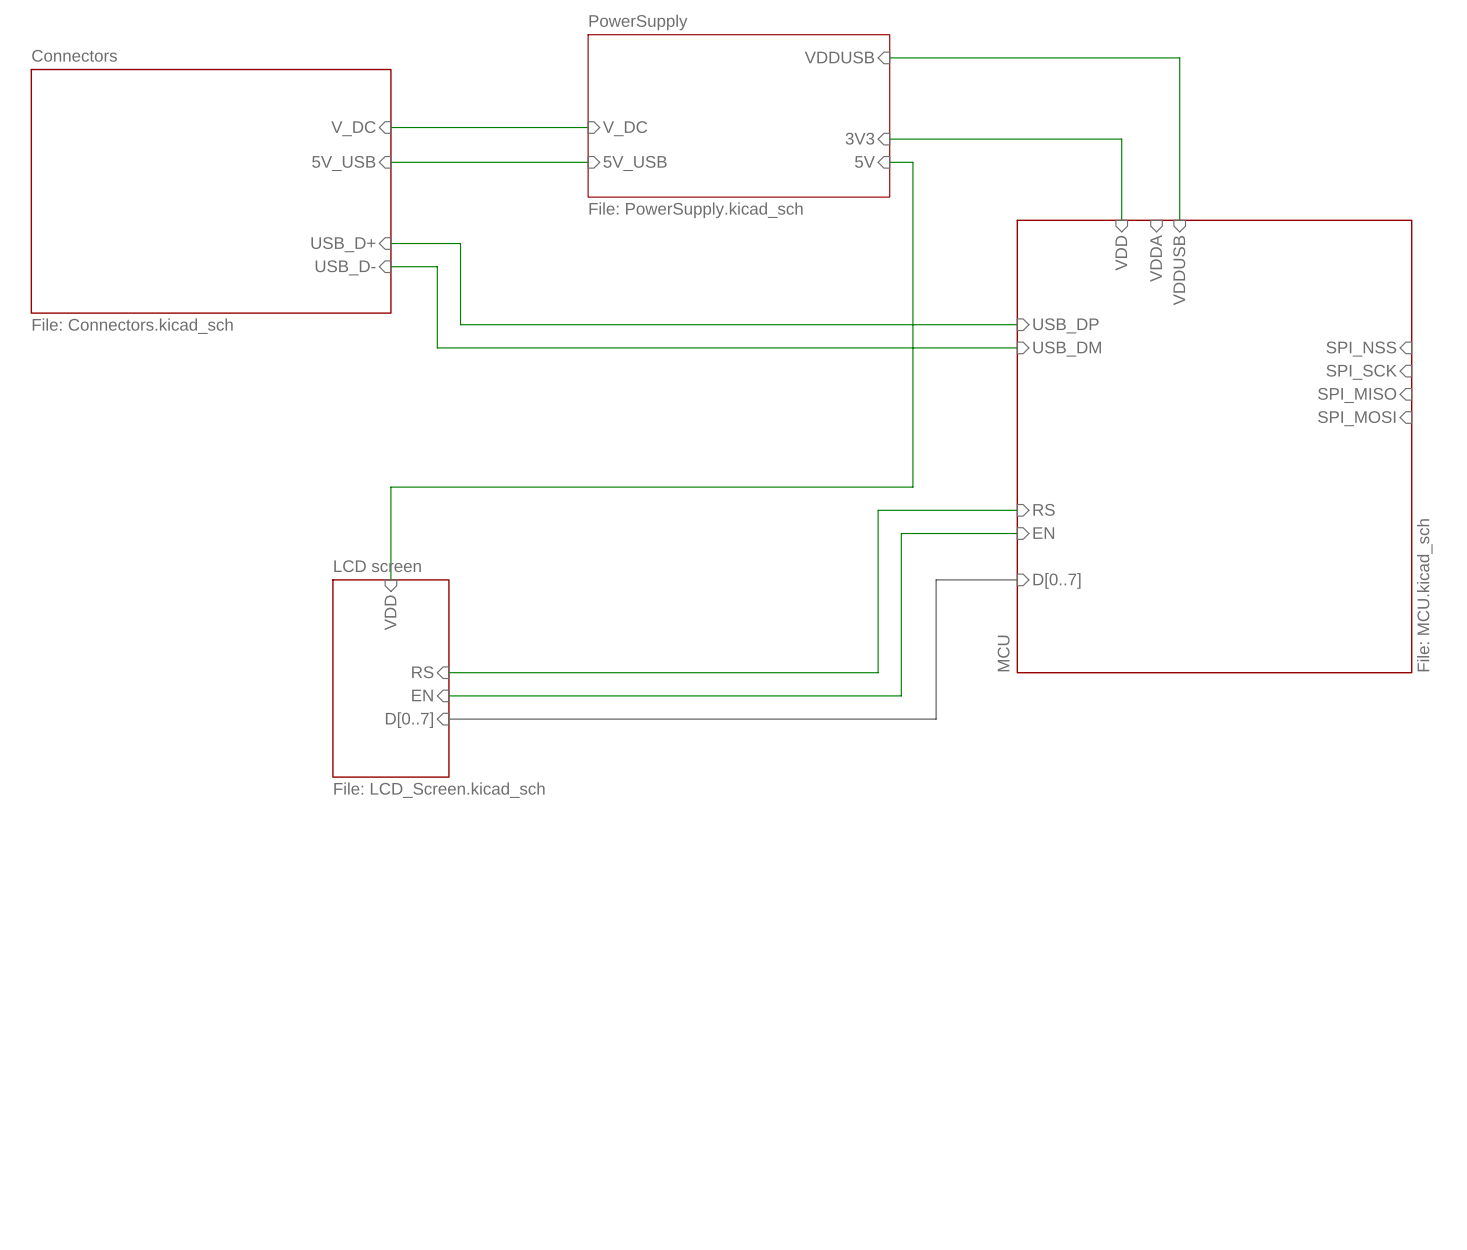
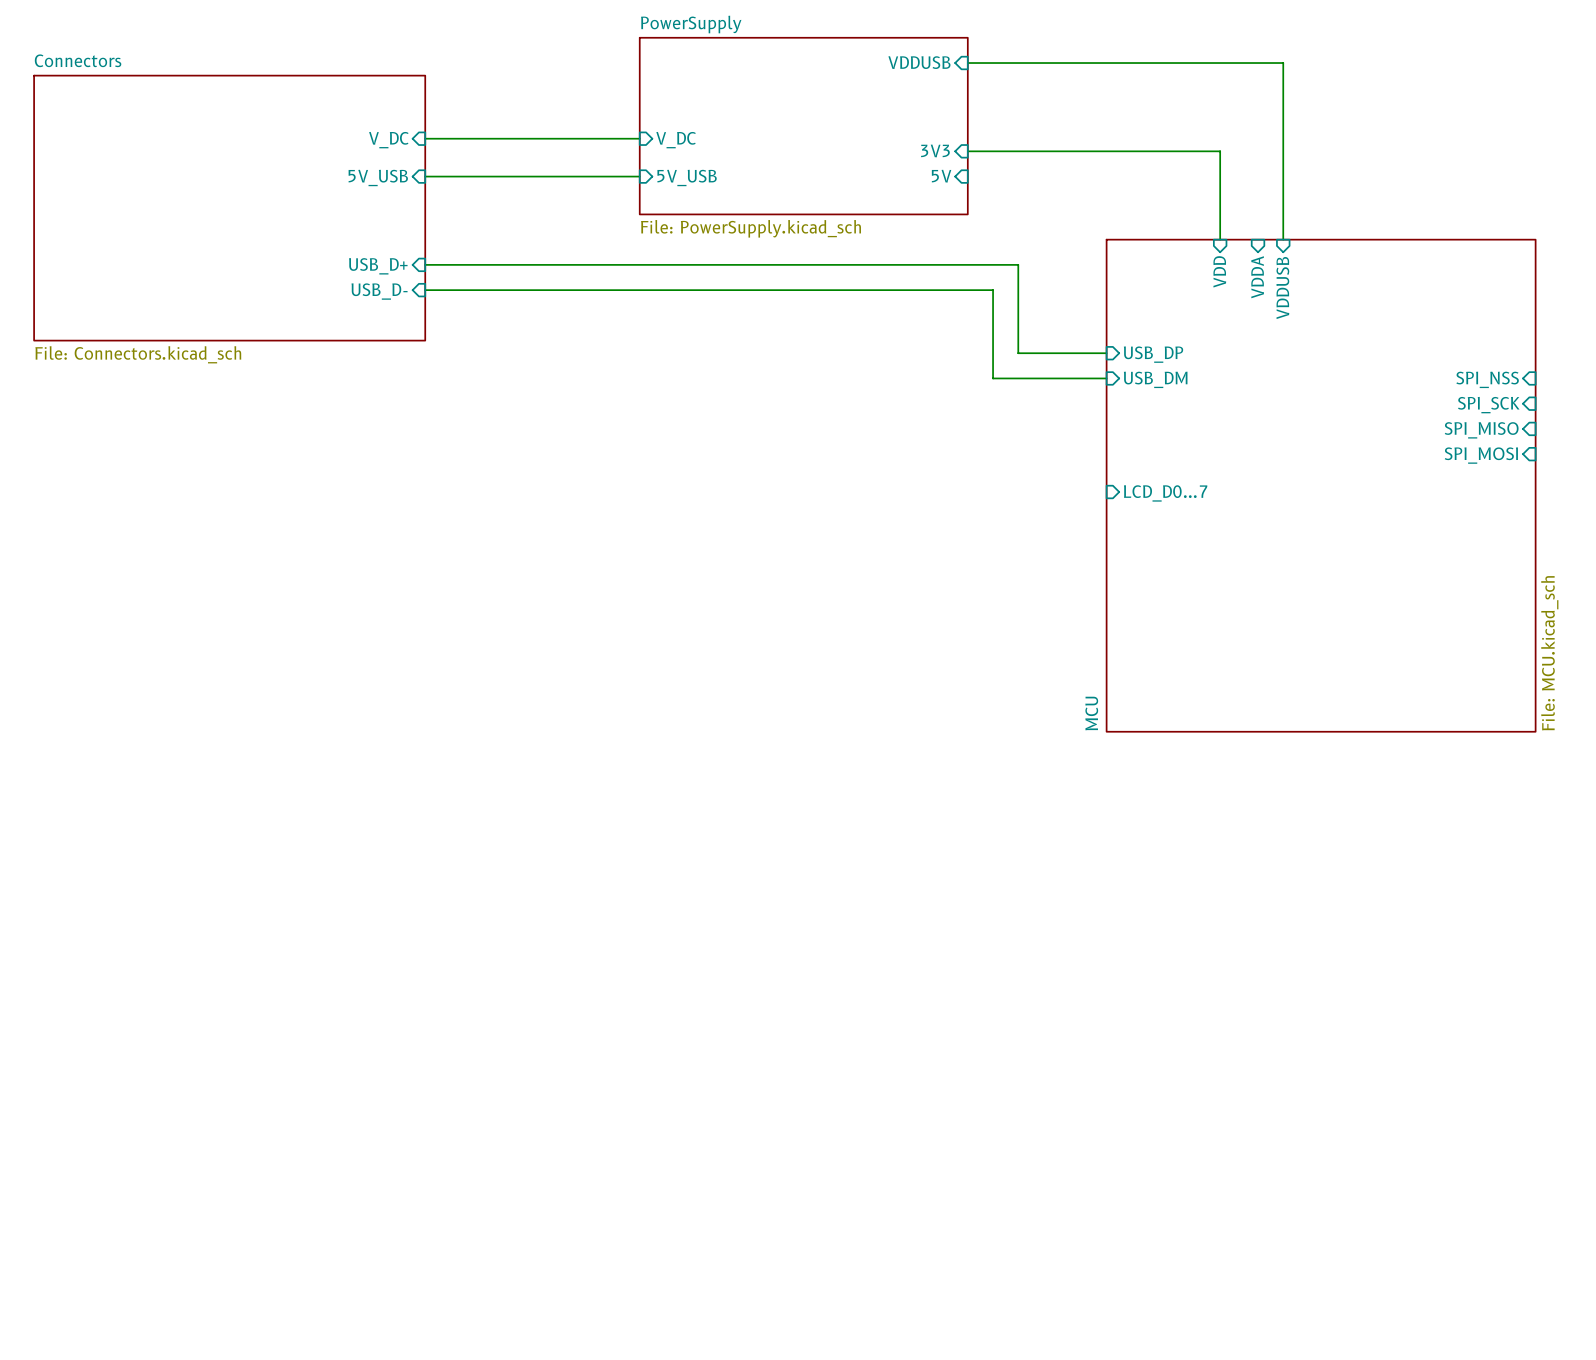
wire: (889, 162) (912, 162) (912, 266) -> (475, 290) (993, 290)
wire: (460, 243) (460, 324) (936, 324) -> (500, 264) (1018, 264) (1018, 353)
wire: (437, 266) (437, 347) (912, 347) (912, 487) (390, 487) (390, 579) -> none
sheet pin: none -> LCD_D0...7 (1165, 493)
sheet pin: RS (1044, 509) -> none
wire: (1017, 510) (878, 510) (878, 672) (448, 672) -> none
wire: (1017, 533) (901, 533) (901, 695) (448, 695) -> none
sheet pin: EN (1043, 533) -> none
bus: (1017, 579) (936, 579) (936, 719) (448, 719) -> none
sheet pin: D[0..7] (1056, 580) -> none
sheet pin: VDD (390, 612) -> none
sheet pin: RS (422, 672) -> none
sheet LCD screen: File: LCD_Screen.kicad_sch (390, 678) -> none
sheet pin: EN (422, 695) -> none
sheet pin: D[0..7] (409, 720) -> none

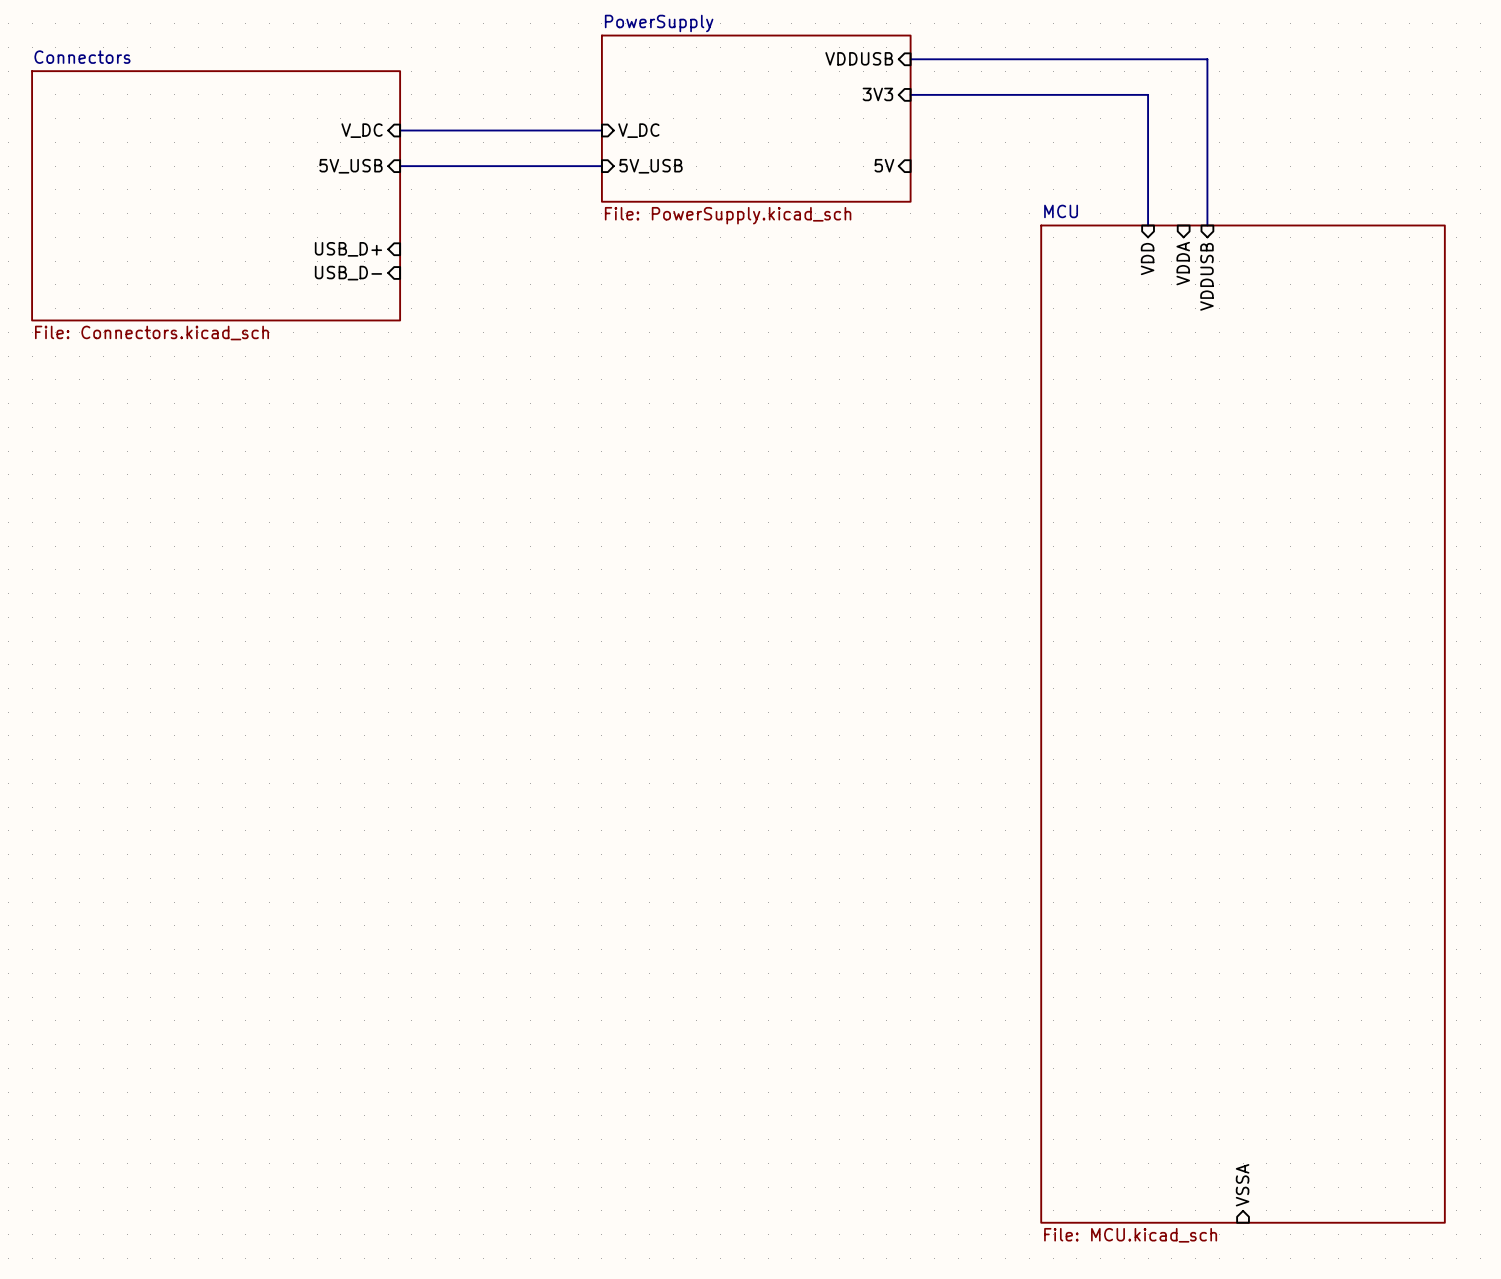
sheet pin position: 3V3 (935, 150) -> 3V3 (877, 94)
wire: (967, 151) (1220, 151) -> (910, 94) (1148, 94) (1148, 142)
wire: (425, 264) (1018, 264) (1018, 353) (1106, 353) -> none
wire: (425, 290) (993, 290) (993, 378) (1106, 378) -> none
sheet pin: USB_DP (1153, 354) -> none
sheet pin: USB_DM (1155, 379) -> none
sheet pin: SPI_NSS (1487, 379) -> none
sheet pin: SPI_SCK (1488, 405) -> none
sheet pin: SPI_MISO (1481, 430) -> none
sheet pin: SPI_MOSI (1481, 455) -> none
sheet MCU: File: MCU.kicad_sch (1321, 485) -> none
sheet pin: LCD_D0...7 (1165, 493) -> none
sheet MCU: none -> File: MCU.kicad_sch (1243, 724)
sheet pin: none -> VSSA (1242, 1185)

